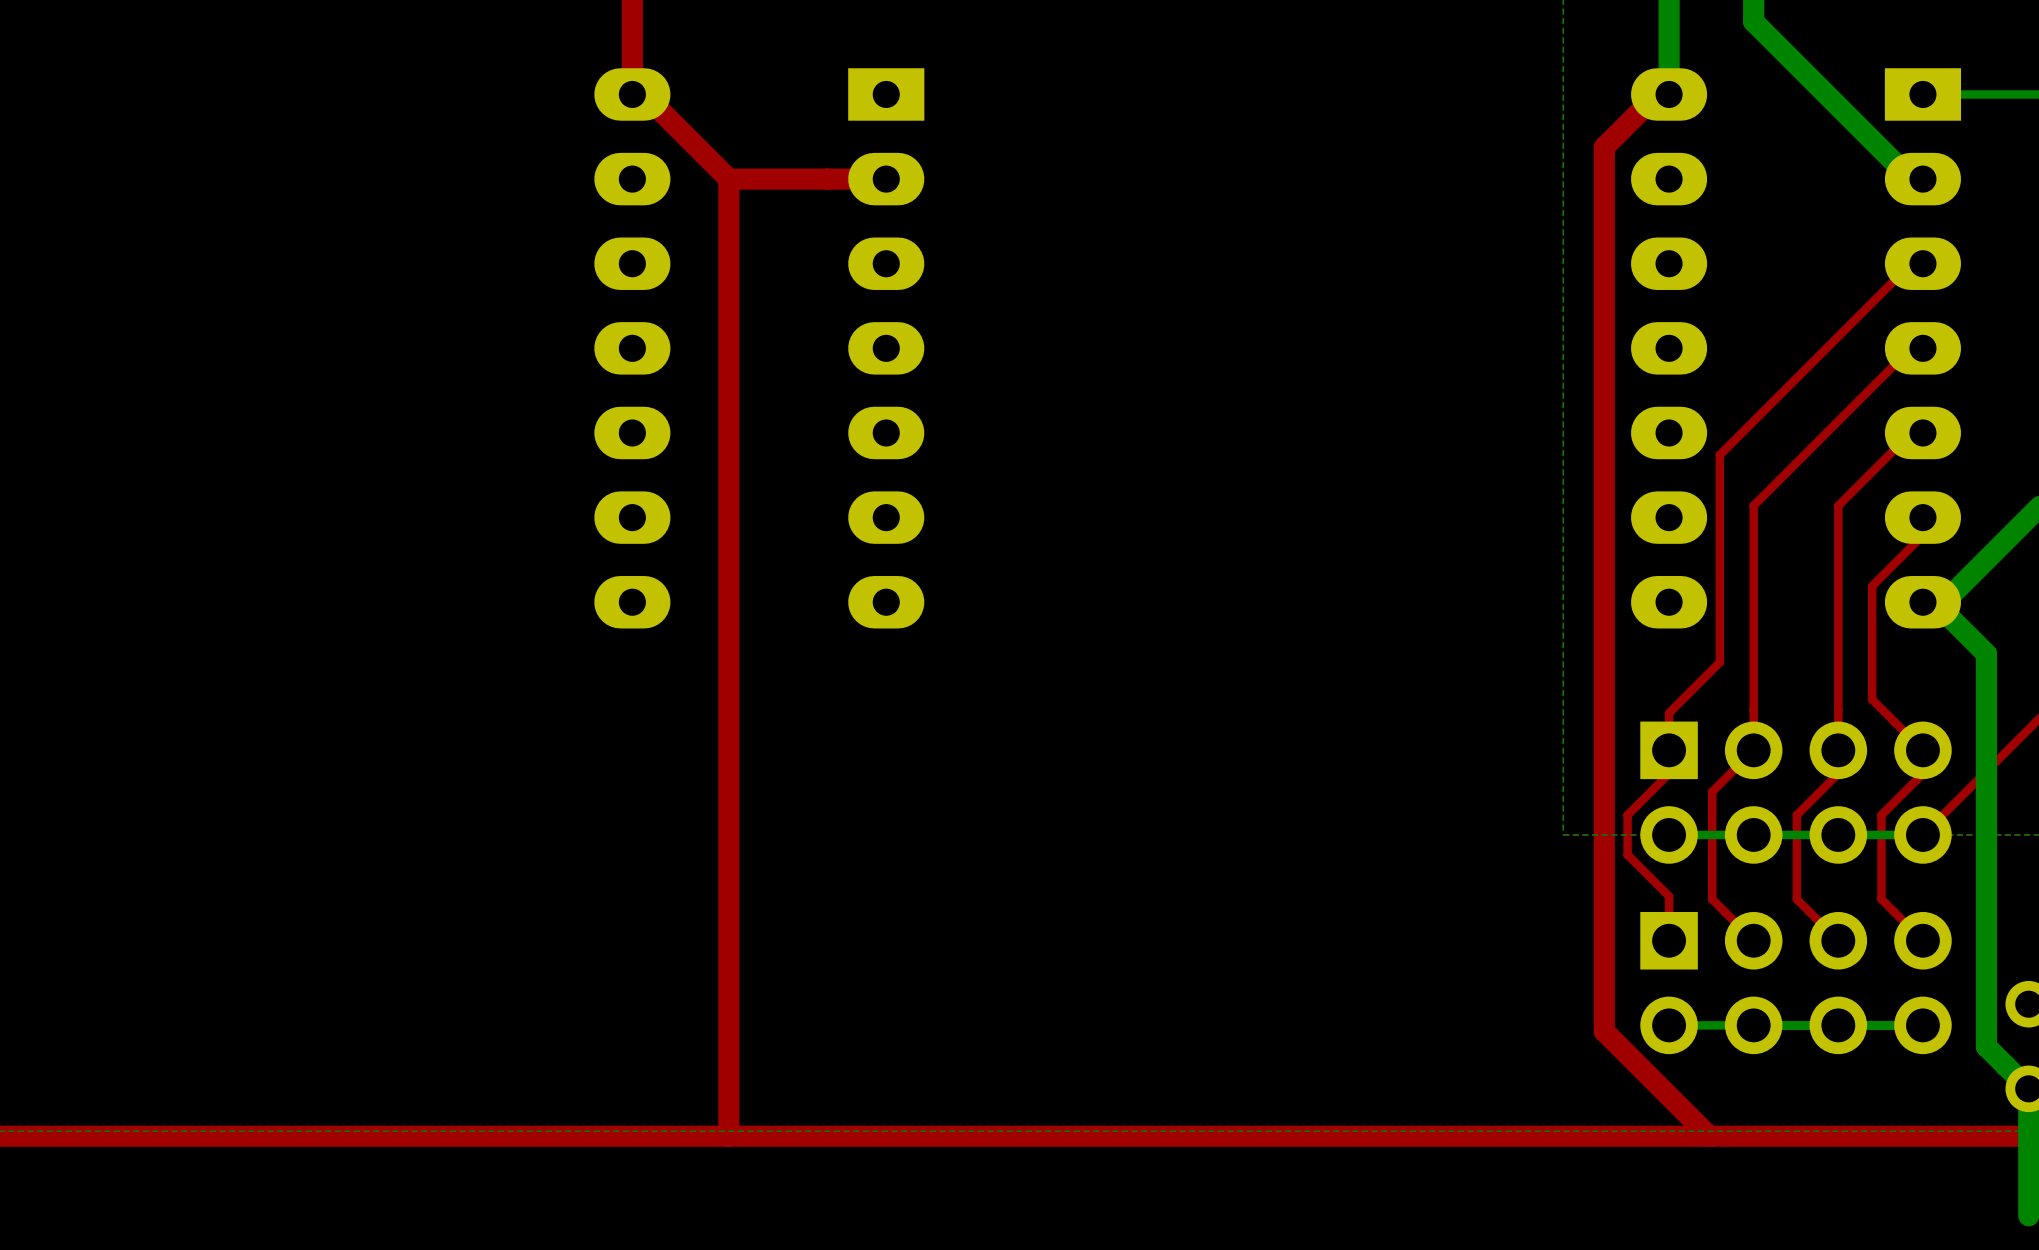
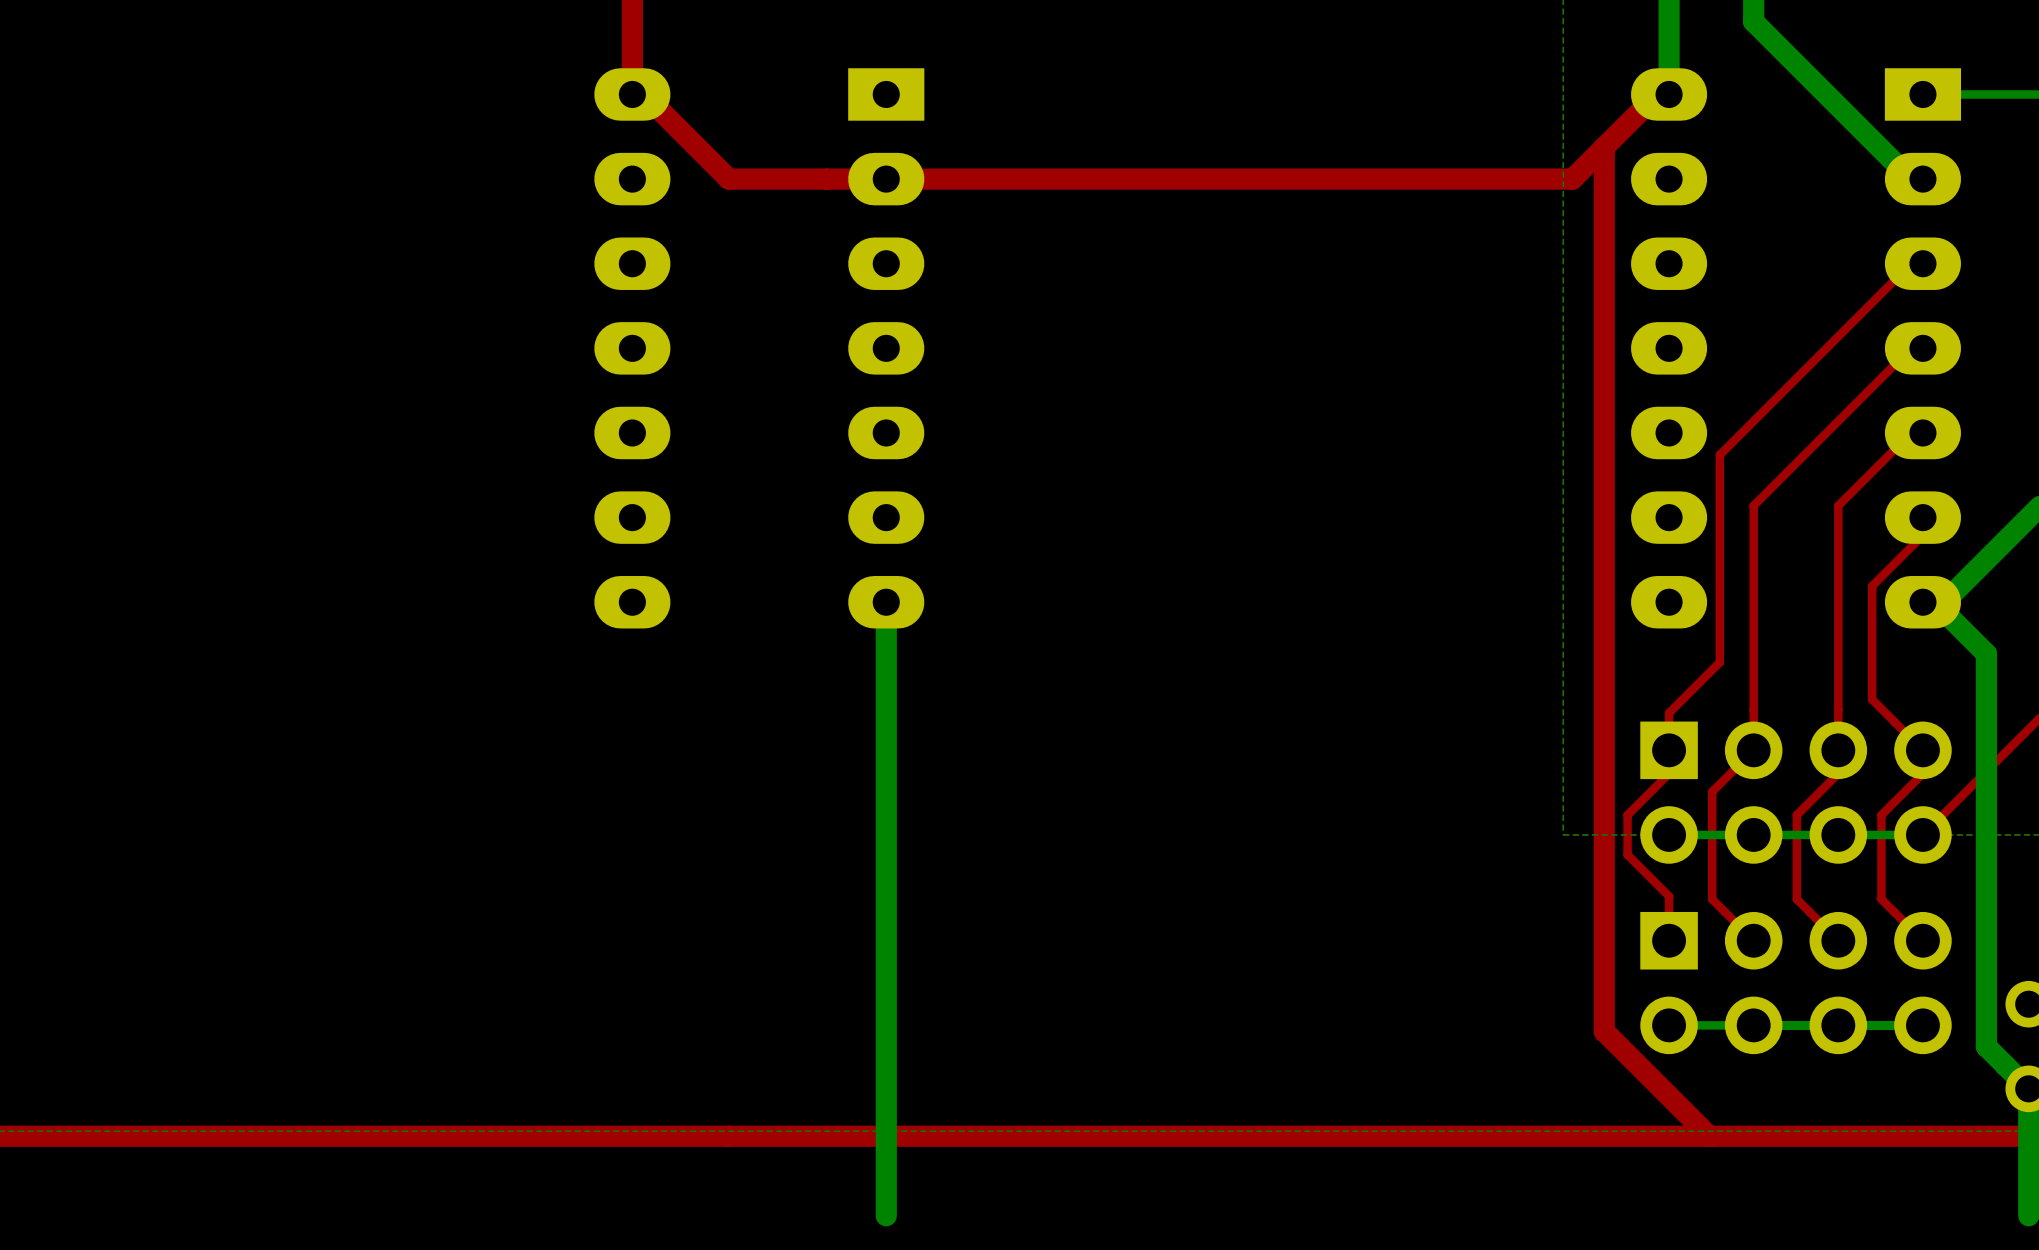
top track: none -> (1604, 147) (1572, 179) (886, 179)
top track: (728, 179) (728, 1136) -> none
bottom track: none -> (886, 602) (886, 1215)

